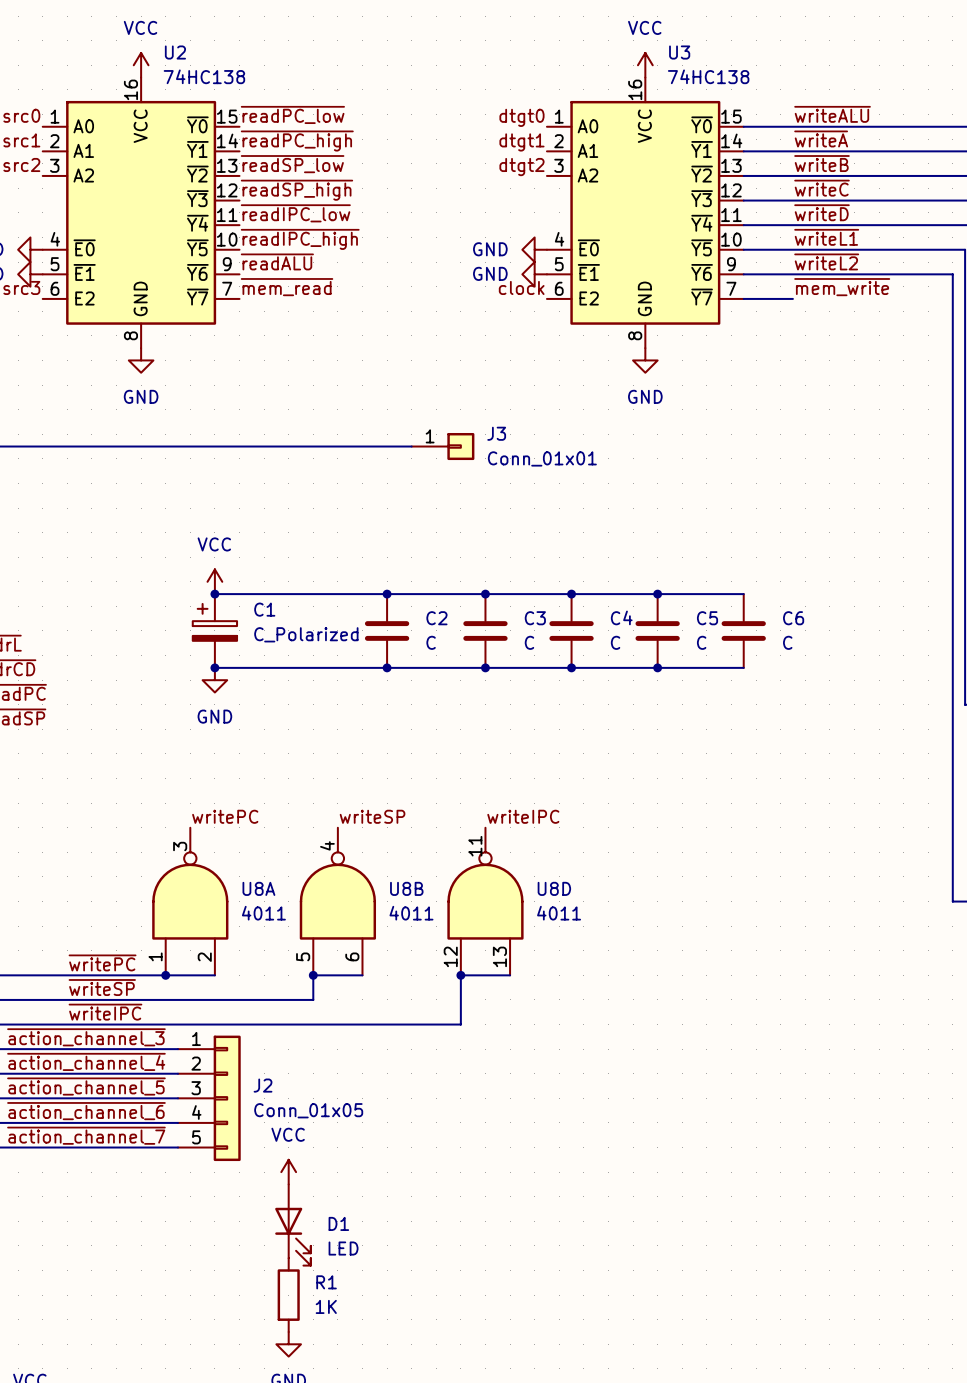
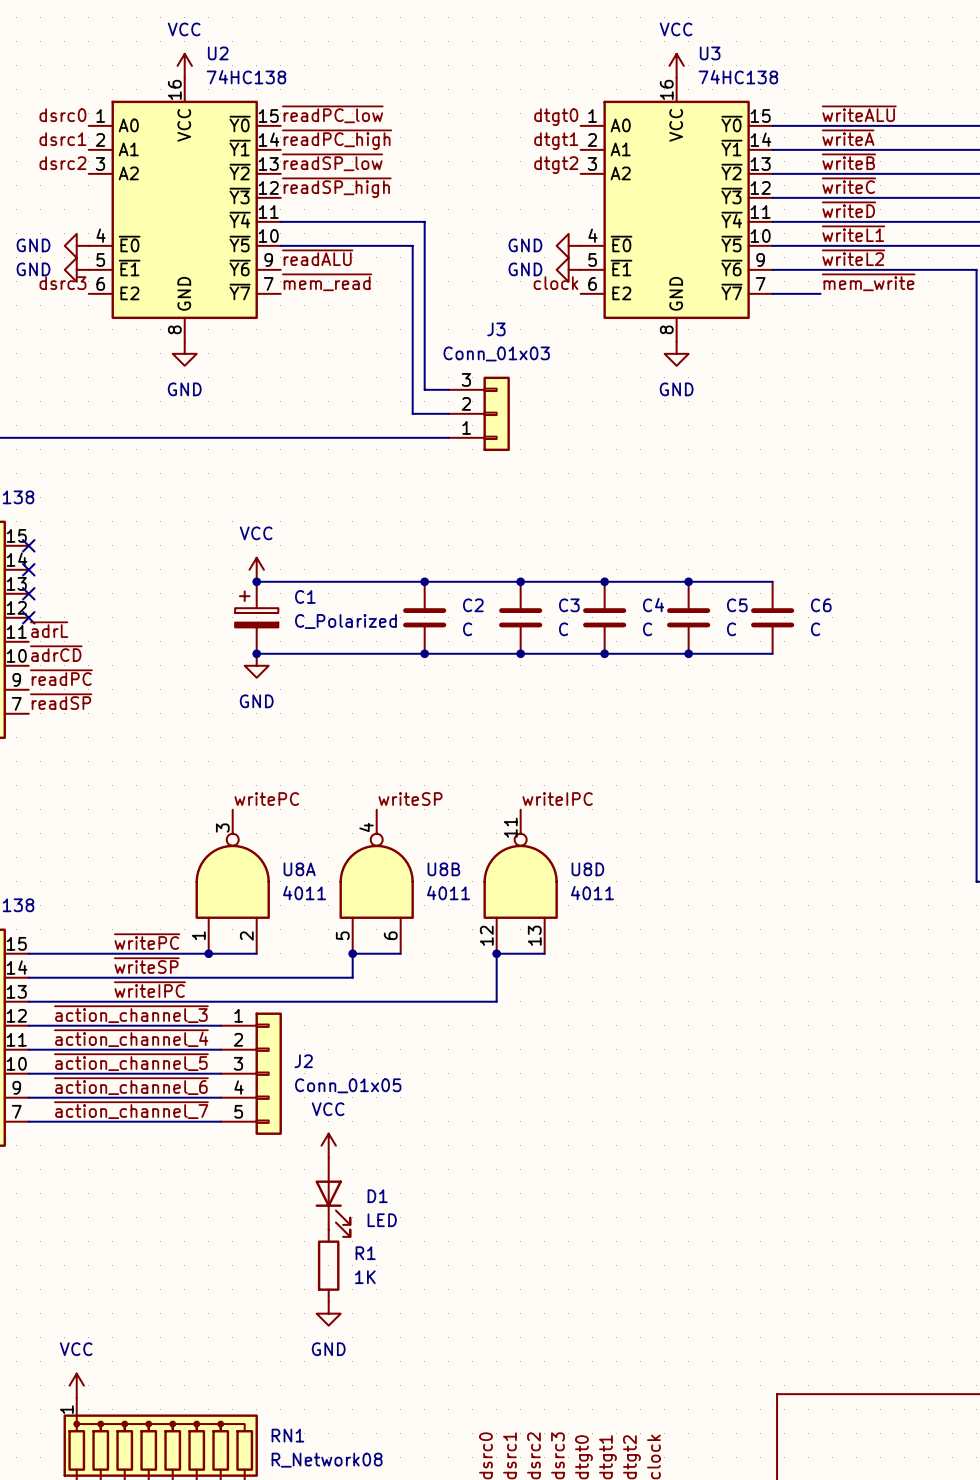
label: ~{readIPC_low} (295, 213) -> none
wire: none -> (280, 221) (424, 221) (424, 389) (448, 389)
label: ~{readIPC_high} (300, 239) -> none
wire: none -> (280, 245) (412, 245) (412, 413) (448, 413)
J3 symbol: [411, 432, 475, 461] -> [448, 376, 510, 452]
J3 name position: J3 (496, 433) -> J3 (496, 329)
J3 value: Conn_01x01 (542, 458) -> Conn_01x03 (496, 353)

